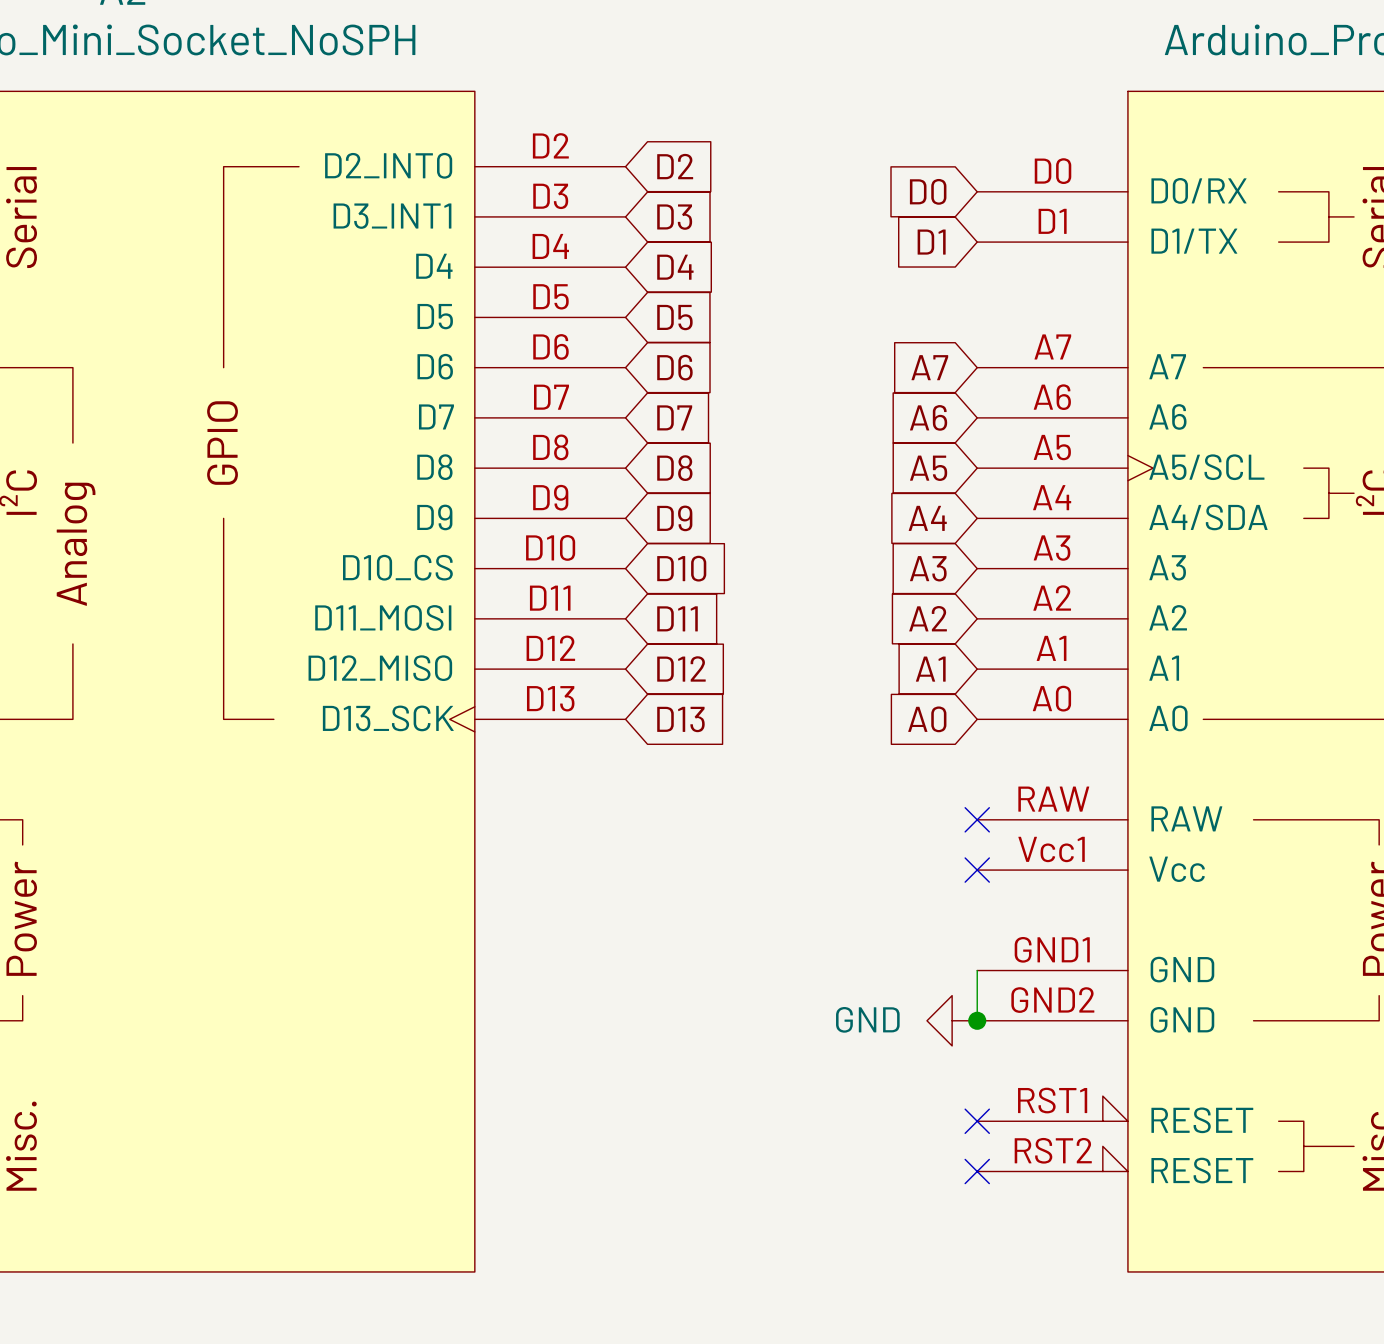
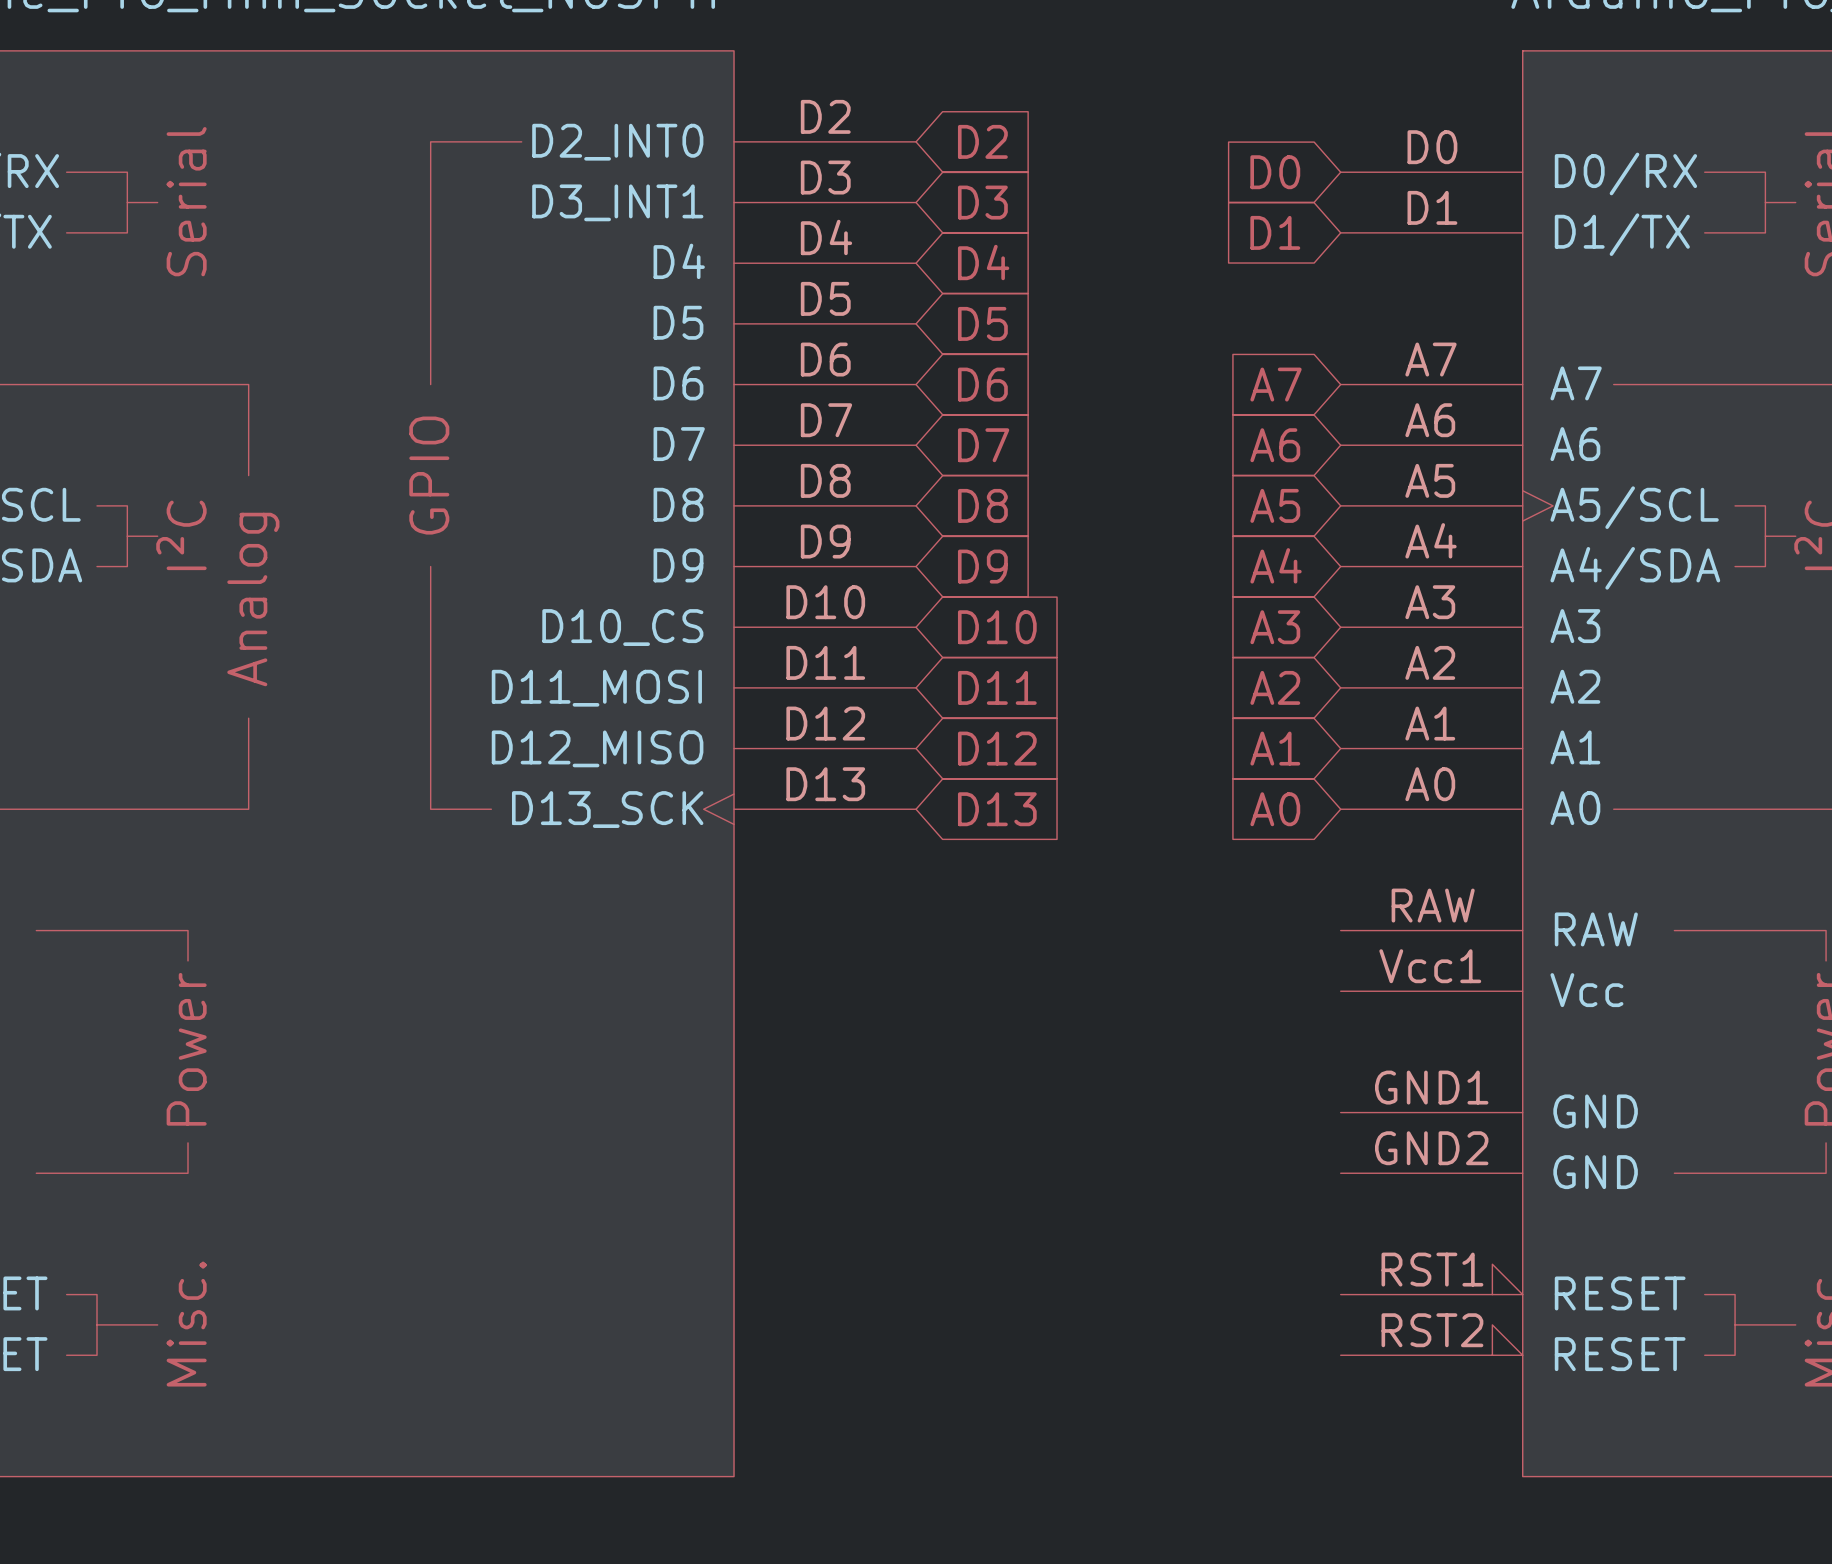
no-connect mark: (977, 819) -> none
no-connect mark: (977, 870) -> none
wire: (977, 970) (977, 1020) -> none
power symbol: GND (952, 1020) -> none
junction: (977, 1020) -> none
no-connect mark: (977, 1121) -> none
no-connect mark: (977, 1171) -> none

